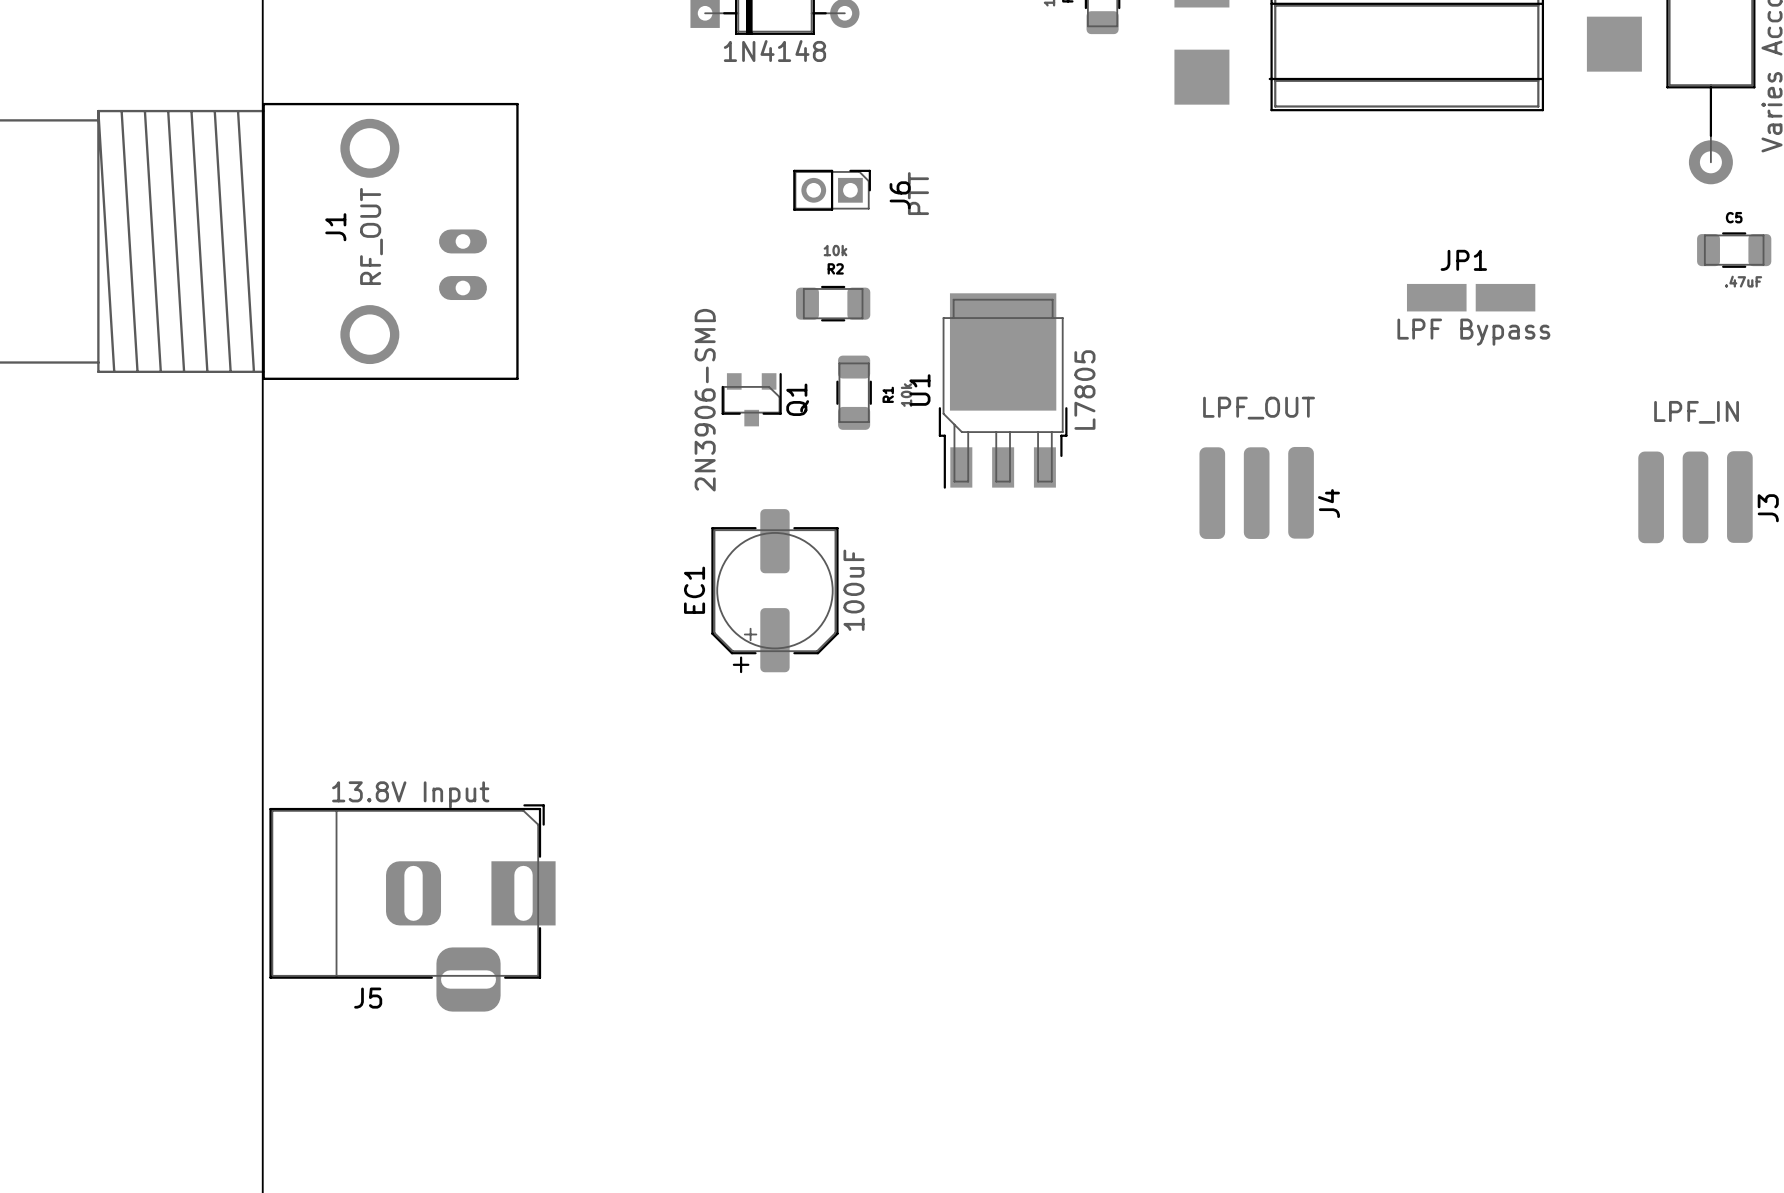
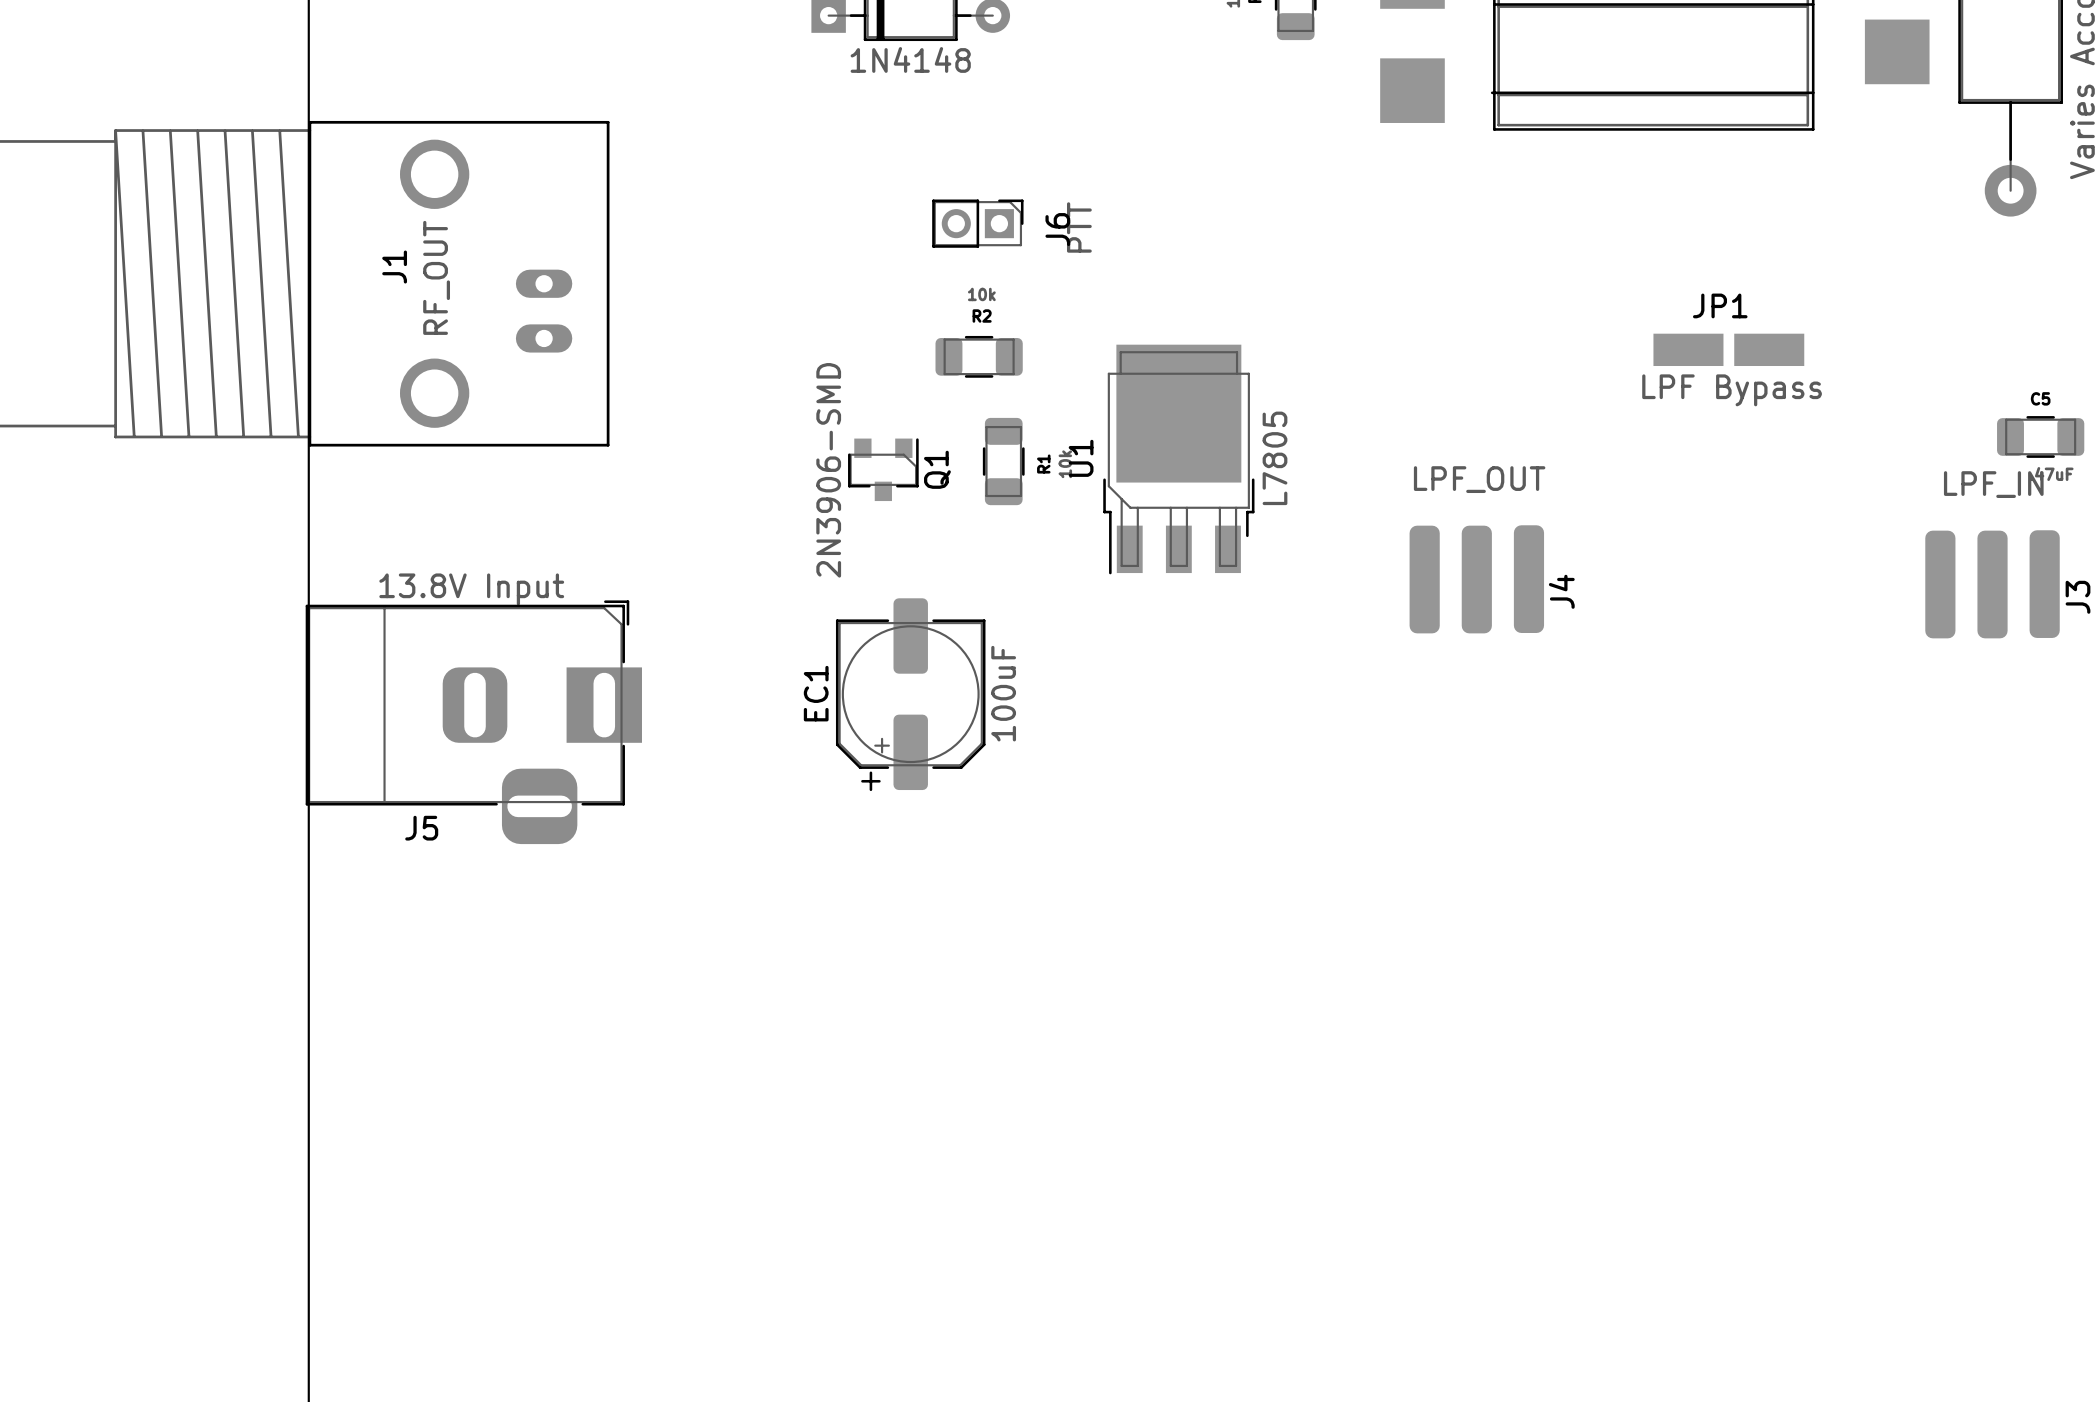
C5 position: (1734, 250) -> (2040, 436)
J5 position: (412, 907) -> (473, 722)

